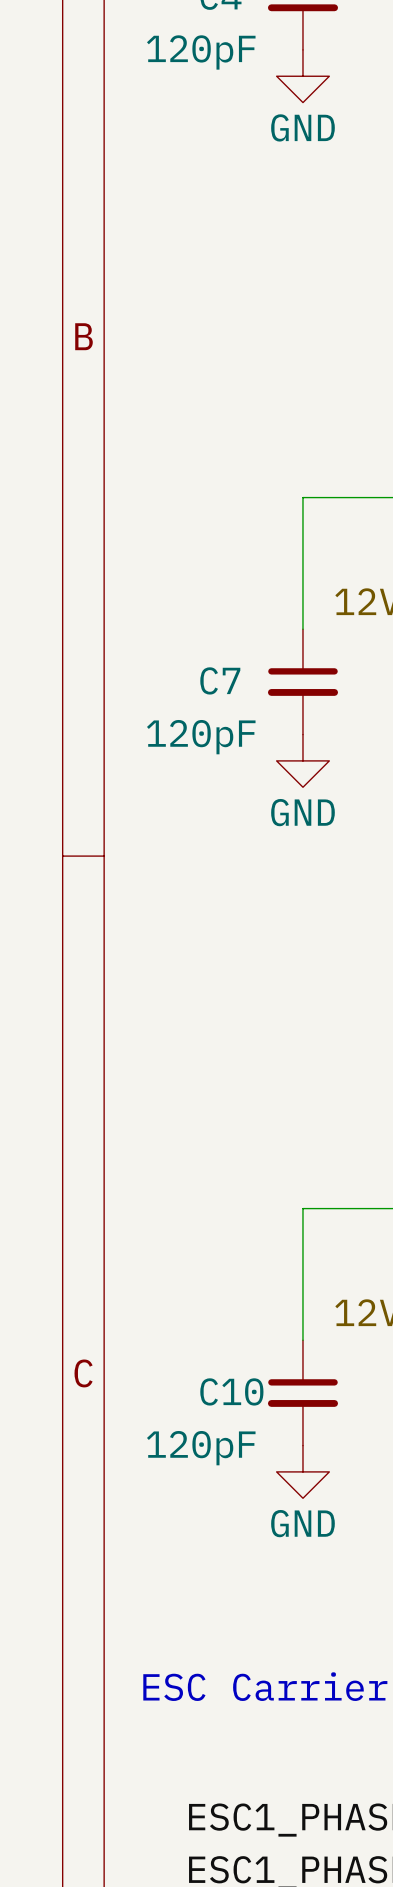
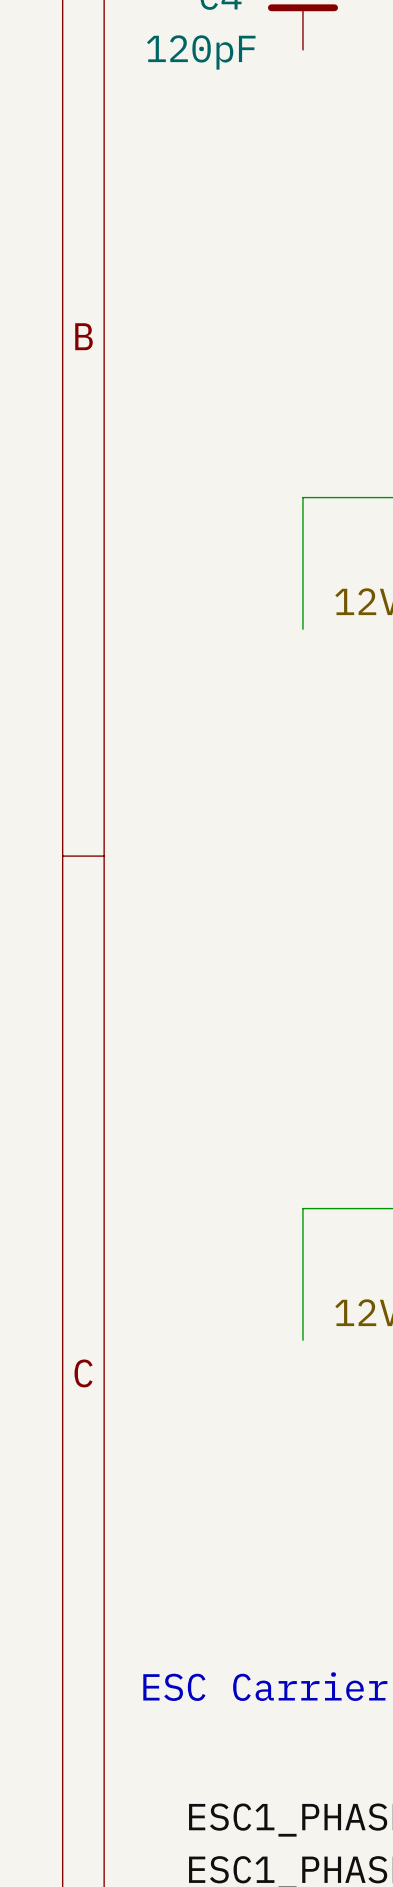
power symbol: GND (302, 76) -> none
C7: 120pF (302, 681) -> none
power symbol: GND (302, 760) -> none
C10: 120pF (302, 1392) -> none
power symbol: GND (302, 1471) -> none

